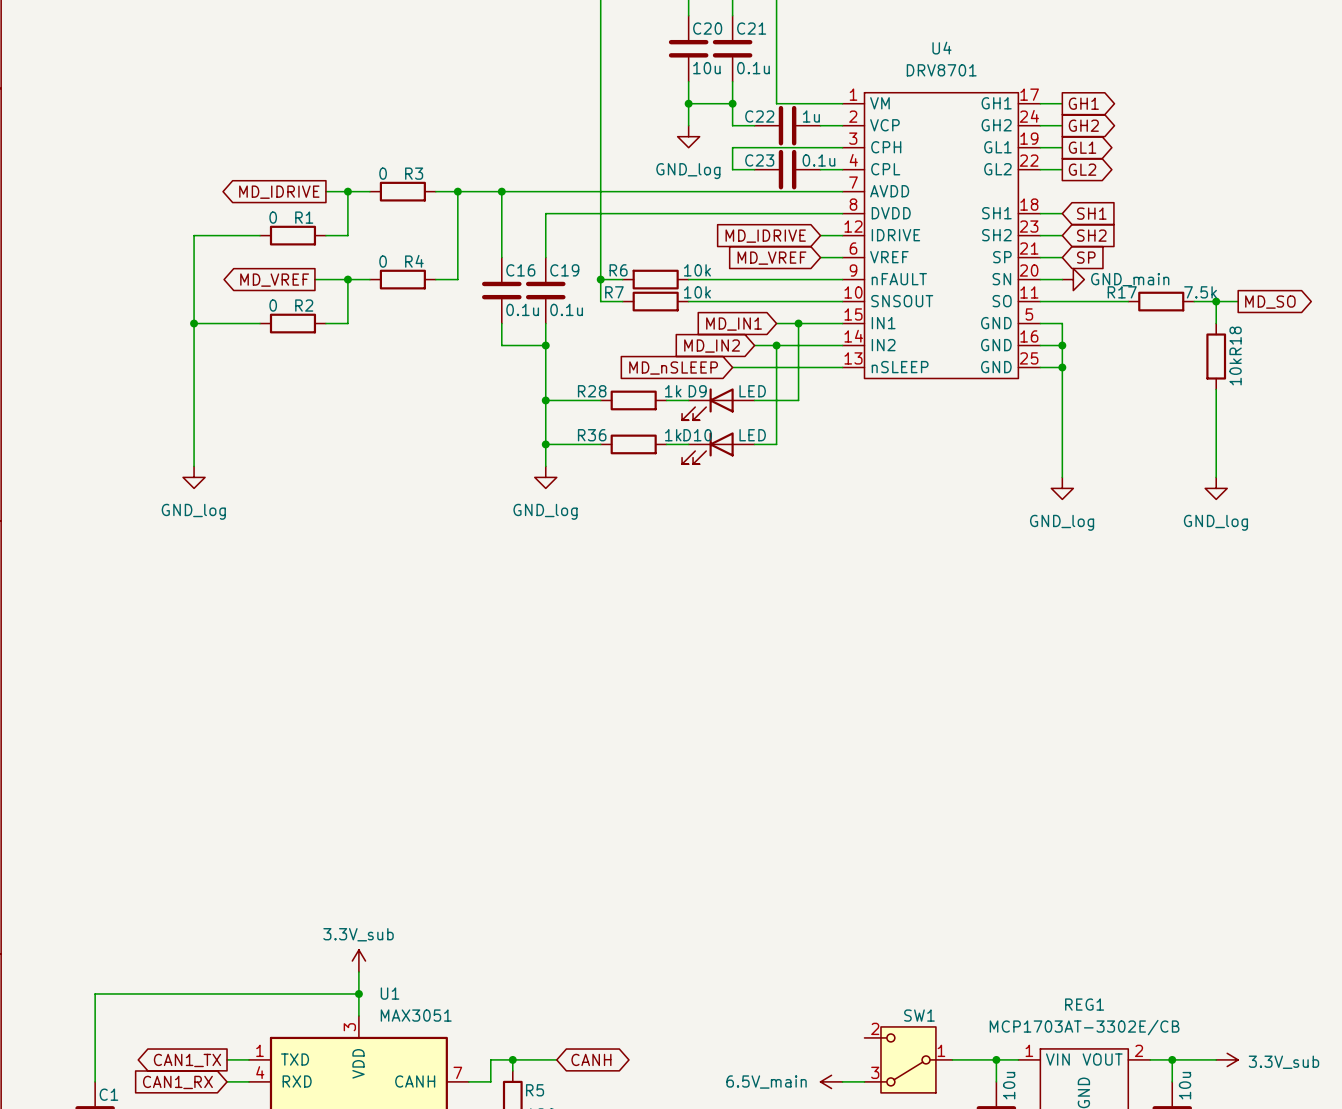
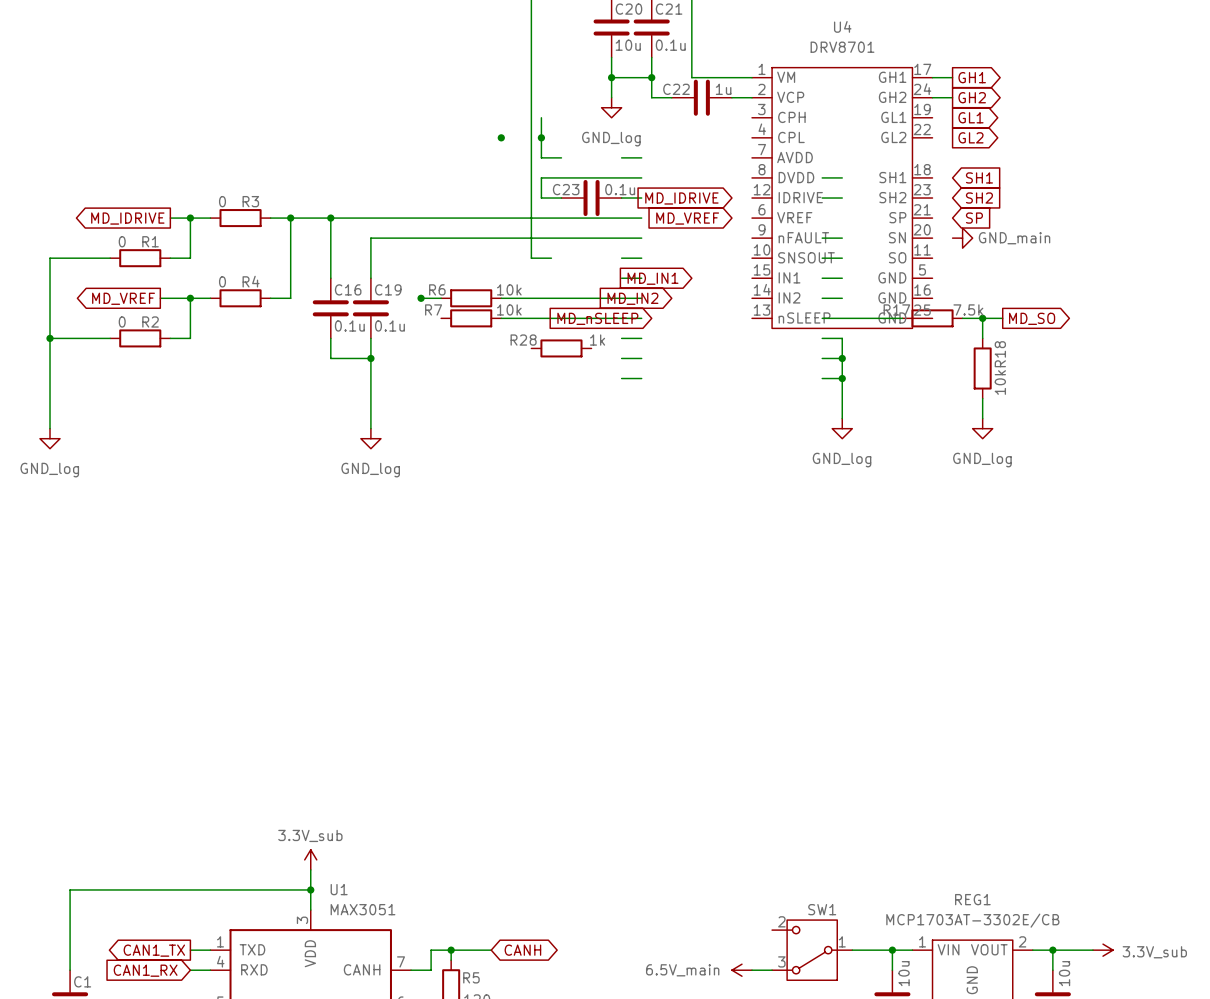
wire: (842, 147) (732, 147) (732, 169) (754, 169) -> none
wire: (1040, 147) (1062, 147) -> (822, 177) (842, 177)
junction: none -> (501, 137)
junction: none -> (541, 137)
C23 position: (787, 169) -> (591, 198)
wire: (820, 169) (842, 169) -> (621, 198) (641, 198)
wire: (1040, 169) (1062, 169) -> (822, 198) (842, 198)
wire: (325, 191) (369, 191) -> (170, 218) (210, 218)
wire: (347, 191) (347, 235) (325, 235) -> (190, 218) (190, 258) (170, 258)
junction: (347, 191) -> none
R3 position: (402, 191) -> (240, 218)
wire: (435, 191) (611, 191) -> (541, 117) (541, 157)
wire: (457, 191) (457, 279) -> (531, 238) (401, 238)
junction: (457, 191) -> none
wire: (501, 191) (501, 257) -> (330, 218) (330, 278)
junction: (501, 191) -> none
wire: (633, 191) (699, 191) -> (551, 238) (611, 238)
wire: (721, 191) (842, 191) -> none
global label position: MD_IDRIVE (279, 192) -> MD_IDRIVE (127, 218)
wire: (611, 213) (545, 213) (545, 257) -> (541, 177) (541, 198) (561, 198)
wire: (721, 213) (842, 213) -> none
wire: (1040, 213) (1062, 213) -> (822, 238) (842, 238)
wire: (259, 235) (194, 235) (194, 466) -> none
R1 position: (292, 235) -> (140, 258)
wire: (820, 235) (842, 235) -> (621, 338) (641, 338)
wire: (1040, 235) (1062, 235) -> (822, 258) (842, 258)
junction: none -> (190, 218)
wire: none -> (270, 218) (641, 218)
wire: none -> (290, 218) (290, 298) (270, 298)
junction: none -> (290, 218)
junction: none -> (330, 218)
wire: (820, 257) (842, 257) -> (621, 278) (641, 278)
wire: (1040, 257) (1062, 257) -> (822, 278) (842, 278)
wire: (314, 279) (369, 279) -> (160, 298) (210, 298)
wire: (347, 279) (347, 323) (325, 323) -> (190, 298) (190, 338) (170, 338)
junction: (347, 279) -> none
R4 position: (402, 279) -> (240, 298)
wire: none -> (380, 238) (370, 238) (370, 278)
junction: (600, 279) -> none
R6 position: (655, 279) -> (471, 298)
wire: (721, 279) (842, 279) -> none
wire: (1040, 279) (1062, 279) -> (822, 298) (842, 298)
global label position: MD_VREF (274, 280) -> MD_VREF (123, 298)
C16 position: (501, 290) -> (330, 308)
C19 position: (545, 290) -> (370, 308)
wire: none -> (110, 258) (50, 258) (50, 428)
R7 position: (655, 301) -> (471, 318)
wire: (688, 301) (699, 301) -> none
wire: (721, 301) (842, 301) -> none
wire: (1040, 301) (1128, 301) -> (822, 318) (902, 318)
R17 position: (1161, 301) -> (932, 318)
wire: (1194, 301) (1238, 301) -> (962, 318) (1002, 318)
wire: (1216, 301) (1216, 323) -> (982, 318) (982, 338)
junction: (1216, 301) -> none
global label position: MD_SO (1270, 302) -> MD_SO (1032, 318)
wire: (194, 323) (259, 323) -> (50, 338) (110, 338)
junction: (194, 323) -> none
R2 position: (292, 323) -> (140, 338)
wire: (501, 323) (501, 345) (545, 345) -> (330, 338) (330, 358) (370, 358)
wire: (545, 323) (545, 466) -> none
wire: (776, 323) (842, 323) -> none
wire: (798, 323) (798, 400) (754, 400) -> none
junction: (798, 323) -> none
wire: (1040, 323) (1062, 323) (1062, 477) -> none
junction: none -> (190, 298)
wire: none -> (421, 298) (441, 298)
junction: none -> (421, 298)
junction: (545, 345) -> none
wire: none -> (501, 298) (641, 298)
wire: (754, 345) (842, 345) -> none
wire: (776, 345) (776, 444) (754, 444) -> none
junction: (776, 345) -> none
wire: (1040, 345) (1062, 345) -> (822, 358) (842, 358)
junction: (1062, 345) -> none
R18 position: (1216, 356) -> (982, 368)
wire: none -> (501, 318) (641, 318)
wire: (732, 367) (842, 367) -> none
wire: (1040, 367) (1062, 367) -> (822, 378) (842, 378)
junction: (1062, 367) -> none
junction: none -> (982, 318)
junction: none -> (50, 338)
wire: none -> (370, 338) (370, 428)
wire: none -> (822, 338) (842, 338) (842, 418)
wire: (1216, 389) (1216, 477) -> none
wire: (545, 400) (600, 400) -> none
junction: (545, 400) -> none
wire: (666, 400) (688, 400) -> (621, 358) (641, 358)
D9: LED (718, 404) -> none
junction: none -> (370, 358)
junction: none -> (842, 358)
junction: none -> (842, 378)
wire: (545, 444) (600, 444) -> none
junction: (545, 444) -> none
R36: 1k (633, 444) -> none
wire: (666, 444) (688, 444) -> (621, 378) (641, 378)
D10: LED (718, 448) -> none
wire: none -> (982, 398) (982, 418)
power symbol: GND_log (194, 477) -> none
power symbol: GND_log (545, 477) -> none
power symbol: none -> GND_log (842, 428)
power symbol position: GND_log (1062, 488) -> GND_log (982, 428)
power symbol: GND_log (1216, 488) -> none
power symbol: none -> GND_log (50, 438)
power symbol: none -> GND_log (370, 438)

